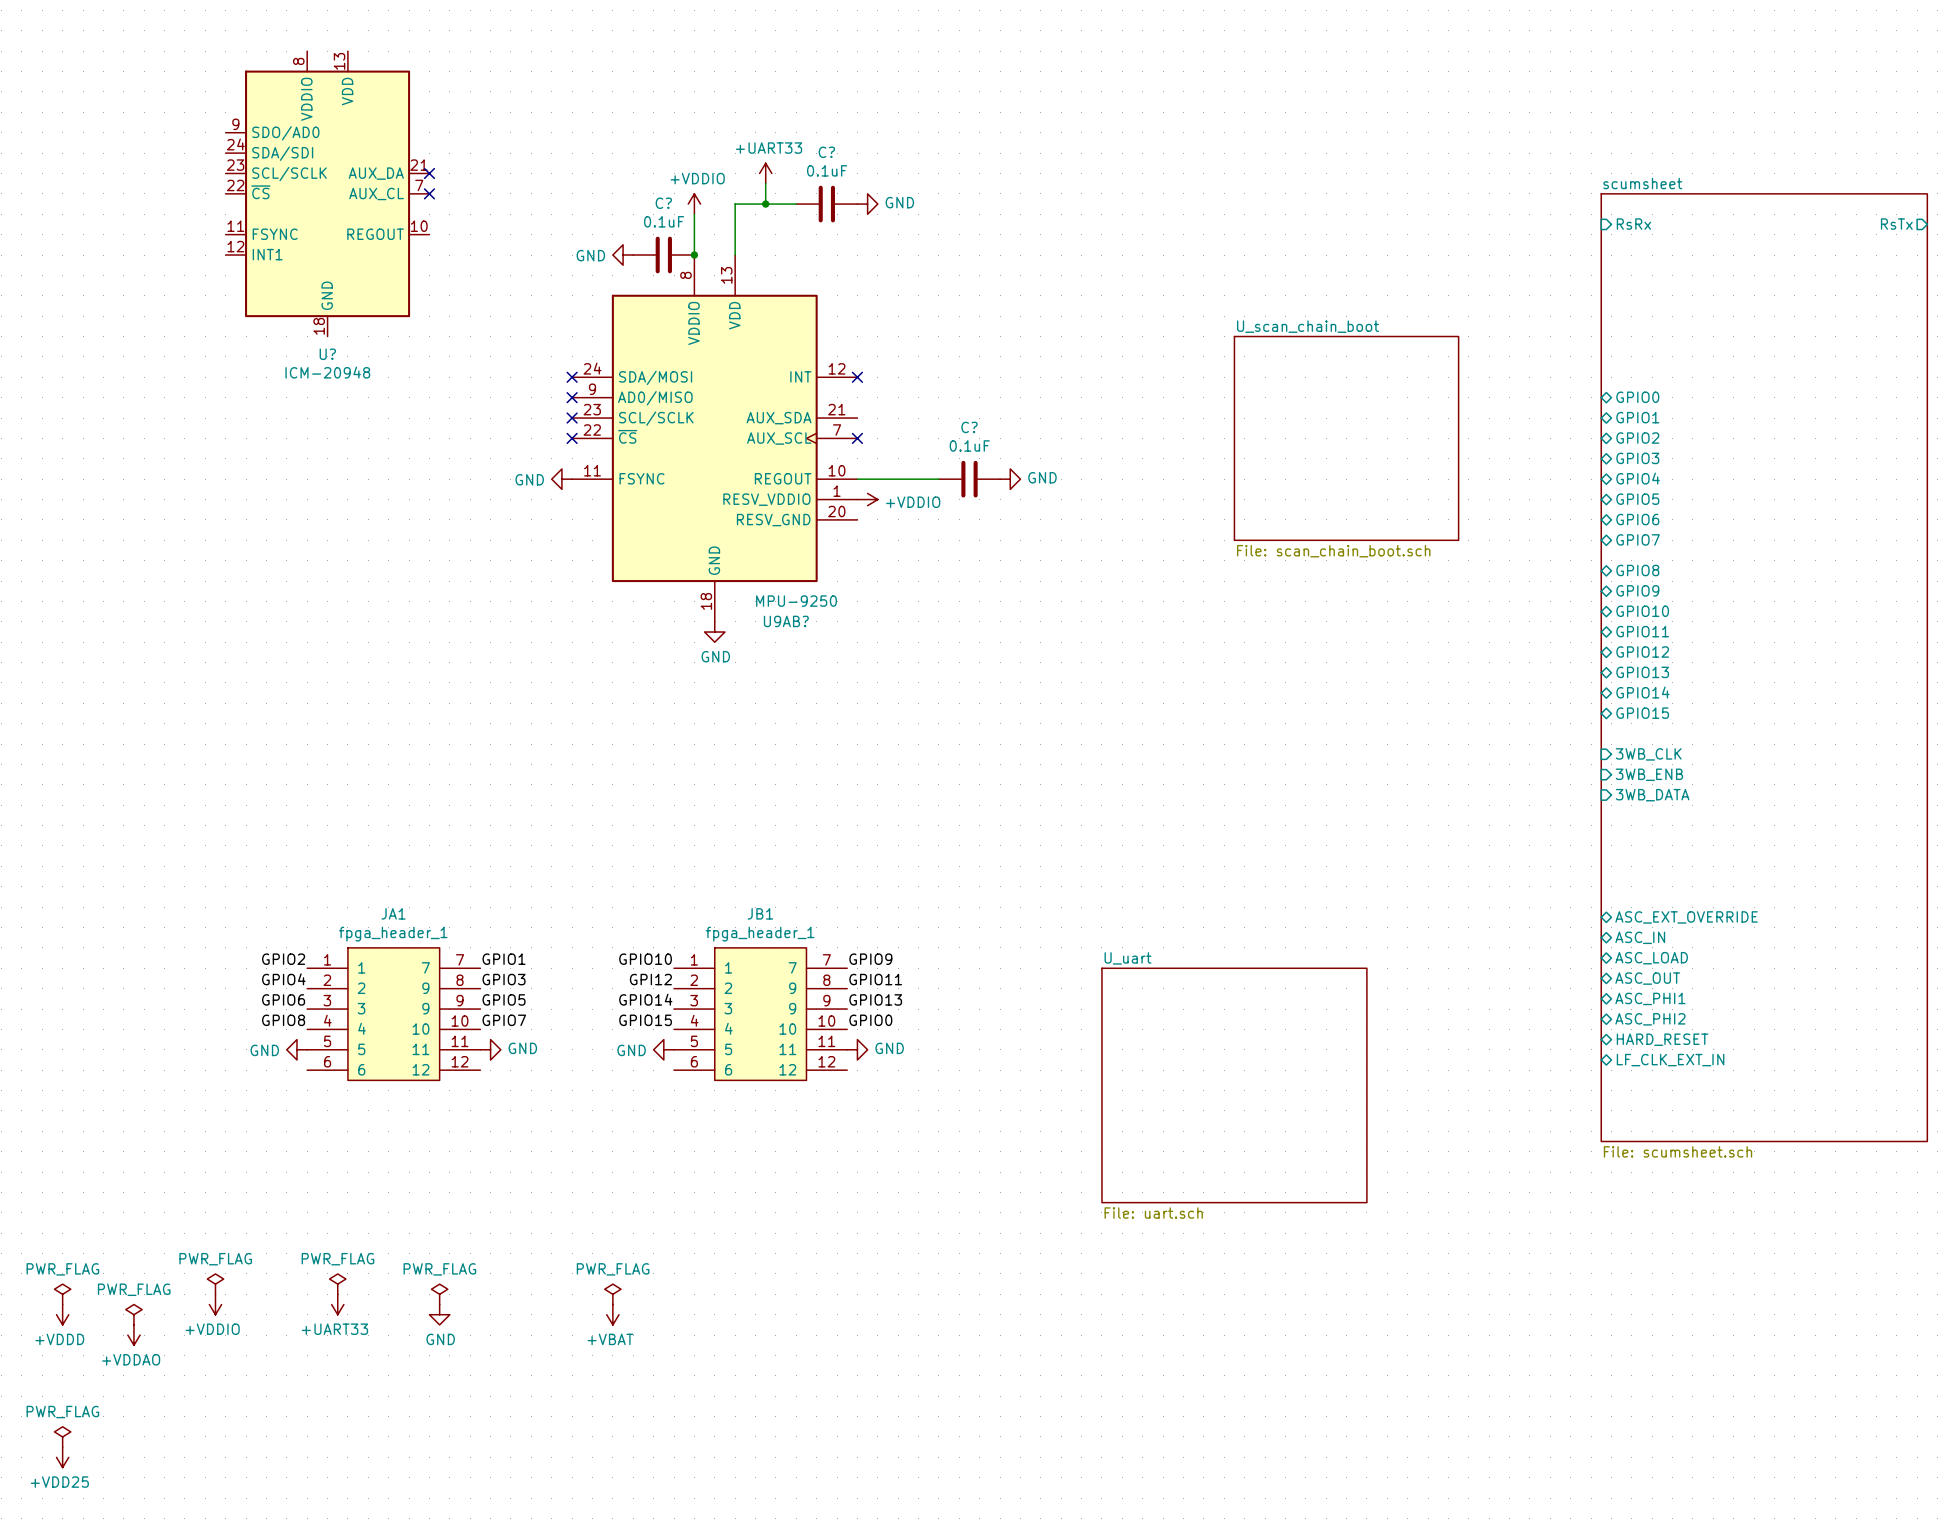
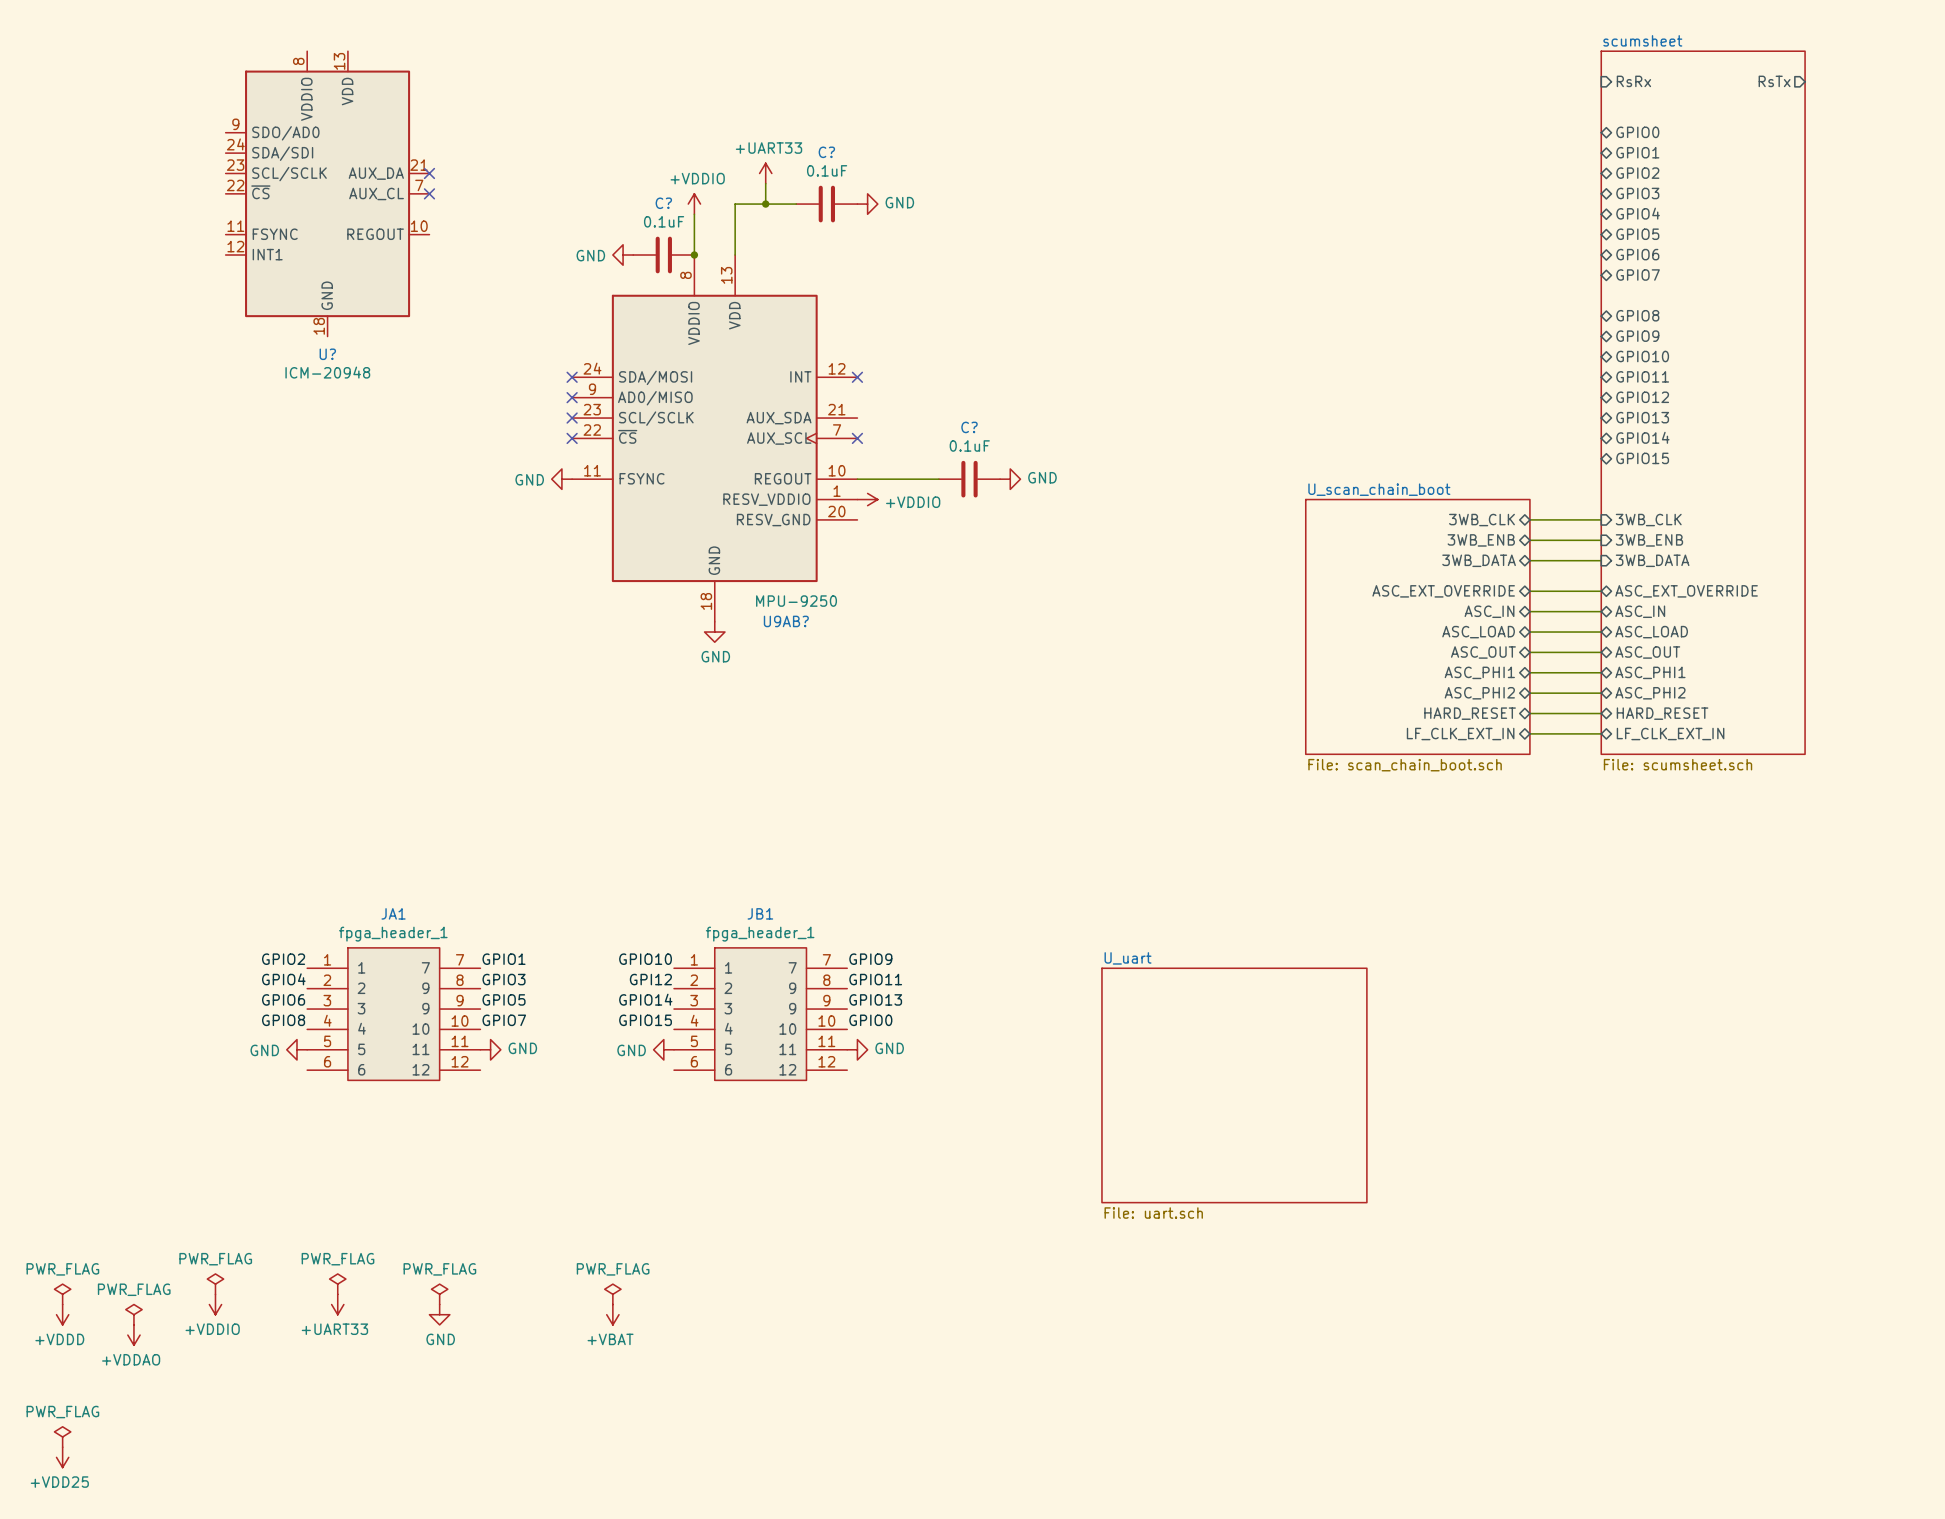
sheet pin: none -> GPIO0 (1637, 132)
sheet pin: none -> GPIO1 (1637, 152)
sheet pin: none -> GPIO2 (1637, 173)
sheet pin: none -> GPIO3 (1637, 193)
sheet pin: none -> GPIO4 (1638, 213)
sheet pin position: RsRx (1633, 224) -> RsRx (1633, 81)
sheet pin position: RsTx (1896, 224) -> RsTx (1774, 81)
sheet pin: none -> GPIO5 (1637, 234)
sheet pin: none -> GPIO6 (1637, 254)
sheet pin: none -> GPIO7 (1638, 275)
sheet pin: none -> GPIO8 (1637, 315)
sheet pin: none -> GPIO9 (1637, 336)
sheet pin: none -> GPIO10 (1642, 356)
sheet pin: none -> GPIO11 (1642, 376)
sheet pin: GPIO0 (1637, 397) -> GPIO12 (1642, 397)
sheet scumsheet: none -> File: scumsheet.sch (1703, 402)
sheet pin: GPIO1 (1637, 417) -> GPIO13 (1642, 417)
sheet U_scan_chain_boot: File: scan_chain_boot.sch (1346, 438) -> none
sheet pin: GPIO2 (1637, 438) -> GPIO14 (1642, 437)
sheet pin: GPIO3 (1637, 458) -> GPIO15 (1642, 458)
sheet pin: GPIO4 (1638, 478) -> none
sheet pin: GPIO5 (1637, 499) -> none
wire: none -> (1529, 519) (1601, 519)
sheet pin shape: bidirectional (1637, 519) -> input (1648, 520)
sheet pin: GPIO6 (1637, 519) -> 3WB_CLK (1648, 520)
sheet pin: none -> 3WB_CLK (1481, 520)
sheet pin shape: bidirectional (1638, 539) -> input (1649, 540)
sheet pin: GPIO7 (1638, 539) -> 3WB_ENB (1649, 540)
sheet pin: none -> 3WB_ENB (1481, 540)
wire: none -> (1529, 540) (1601, 540)
sheet pin: none -> 3WB_DATA (1479, 560)
wire: none -> (1529, 560) (1601, 560)
sheet pin: none -> 3WB_DATA (1652, 560)
sheet pin: GPIO8 (1637, 570) -> none
sheet pin: GPIO9 (1637, 590) -> ASC_EXT_OVERRIDE (1686, 591)
sheet pin: none -> ASC_EXT_OVERRIDE (1443, 591)
wire: none -> (1529, 591) (1601, 591)
sheet pin: none -> ASC_IN (1489, 611)
wire: none -> (1529, 611) (1601, 611)
sheet pin: GPIO10 (1642, 611) -> ASC_IN (1640, 611)
sheet U_scan_chain_boot: none -> File: scan_chain_boot.sch (1417, 626)
sheet pin: GPIO11 (1642, 631) -> ASC_LOAD (1651, 632)
sheet pin: none -> ASC_LOAD (1478, 632)
wire: none -> (1529, 632) (1601, 632)
sheet pin: none -> ASC_OUT (1483, 652)
wire: none -> (1529, 652) (1601, 652)
sheet pin: GPIO12 (1642, 652) -> ASC_OUT (1647, 652)
sheet scumsheet: File: scumsheet.sch (1764, 667) -> none
sheet pin: none -> ASC_PHI1 (1479, 672)
wire: none -> (1529, 672) (1601, 672)
sheet pin: GPIO13 (1642, 672) -> ASC_PHI1 (1650, 672)
sheet pin: GPIO14 (1642, 692) -> ASC_PHI2 (1650, 693)
sheet pin: none -> ASC_PHI2 (1479, 693)
wire: none -> (1529, 693) (1601, 693)
sheet pin: none -> HARD_RESET (1470, 713)
wire: none -> (1529, 713) (1601, 713)
sheet pin: GPIO15 (1642, 713) -> HARD_RESET (1662, 713)
wire: none -> (1529, 733) (1601, 733)
sheet pin: none -> LF_CLK_EXT_IN (1460, 734)
sheet pin: none -> LF_CLK_EXT_IN (1670, 734)
sheet pin: 3WB_CLK (1648, 754) -> none
sheet pin: 3WB_ENB (1649, 774) -> none
sheet pin: 3WB_DATA (1652, 795) -> none
sheet pin: ASC_EXT_OVERRIDE (1686, 917) -> none
sheet pin: ASC_IN (1640, 937) -> none
sheet pin: ASC_LOAD (1651, 958) -> none
sheet pin: ASC_OUT (1647, 978) -> none
sheet pin: ASC_PHI1 (1650, 998) -> none
sheet pin: ASC_PHI2 (1650, 1019) -> none
sheet pin: HARD_RESET (1662, 1039) -> none
sheet pin: LF_CLK_EXT_IN (1670, 1060) -> none

